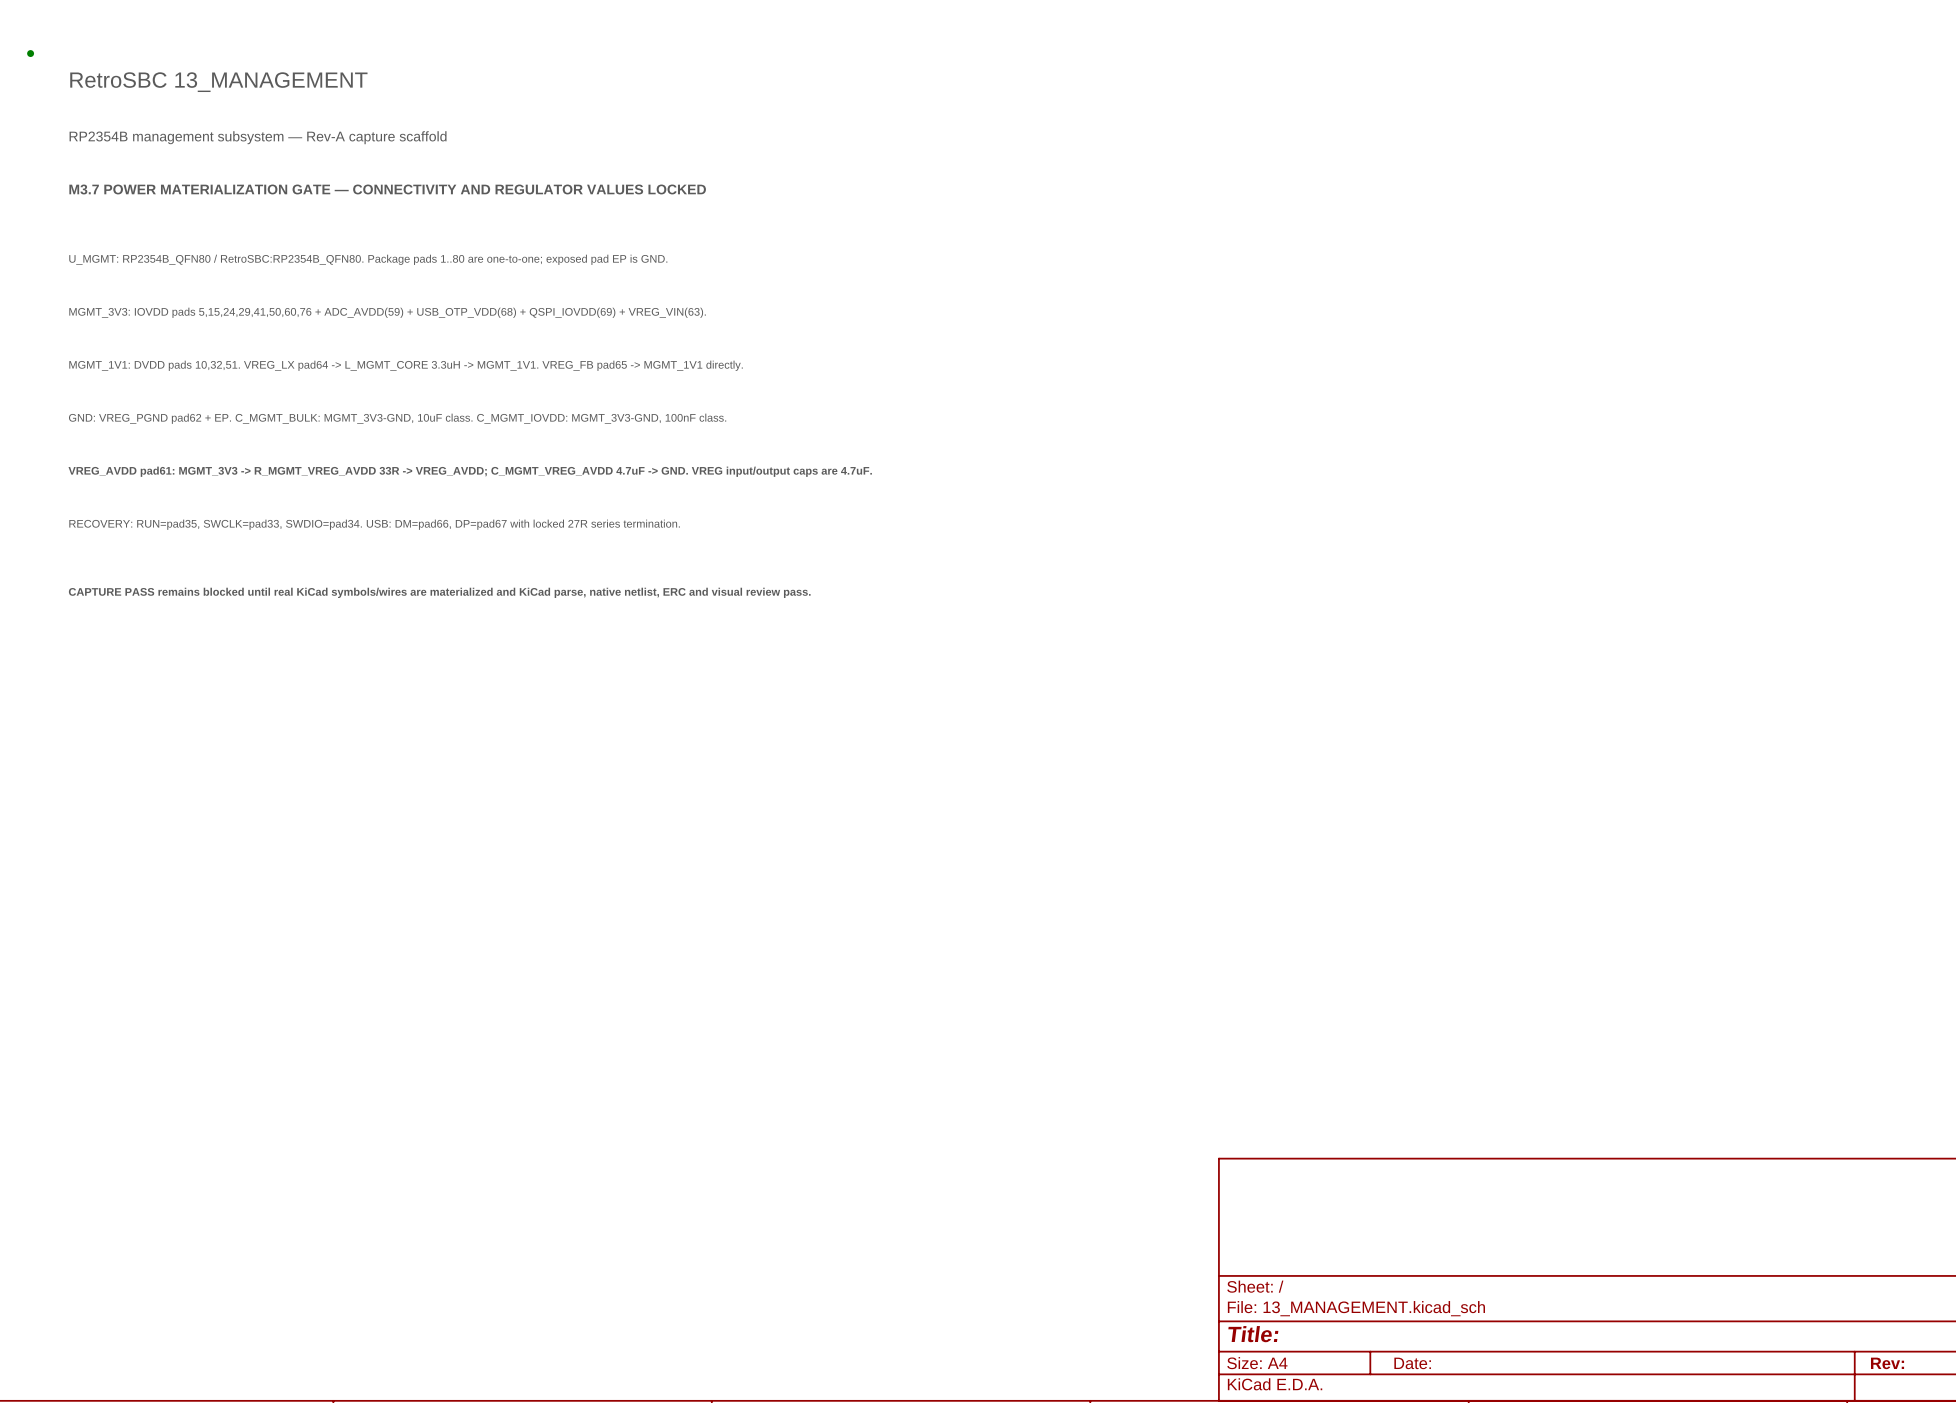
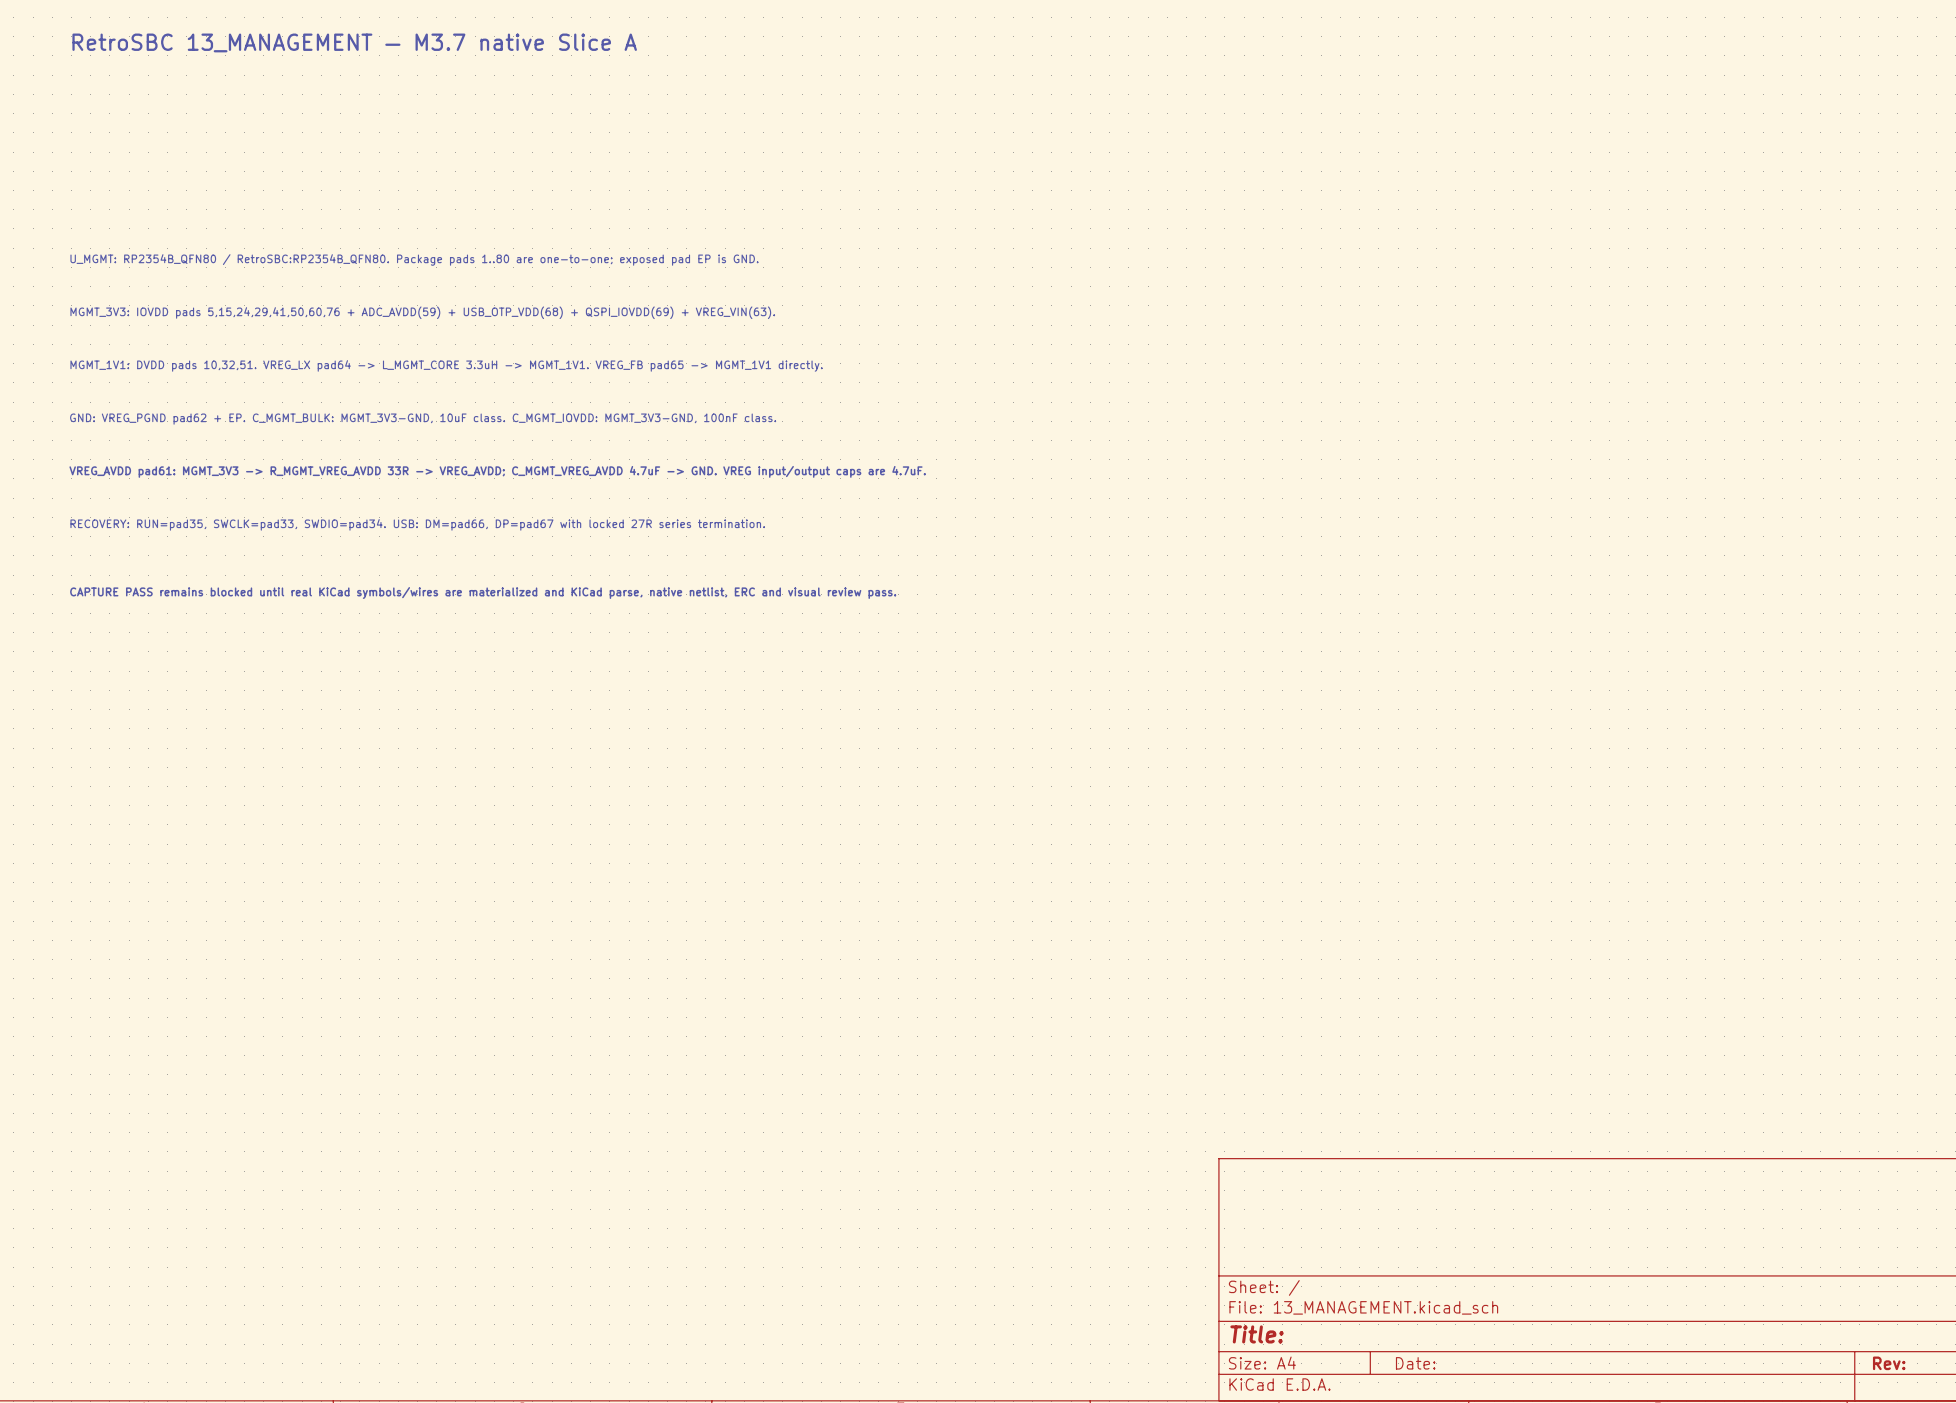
text: none -> RetroSBC 13_MANAGEMENT — M3.7 native Slice A (354, 42)
junction: (30, 53) -> none
text: RetroSBC 13_MANAGEMENT (218, 82) -> none
text: RP2354B management subsystem — Rev-A capture scaffold (258, 137) -> none
text: M3.7 POWER MATERIALIZATION GATE — CONNECTIVITY AND REGULATOR VALUES LOCKED (387, 189) -> none

